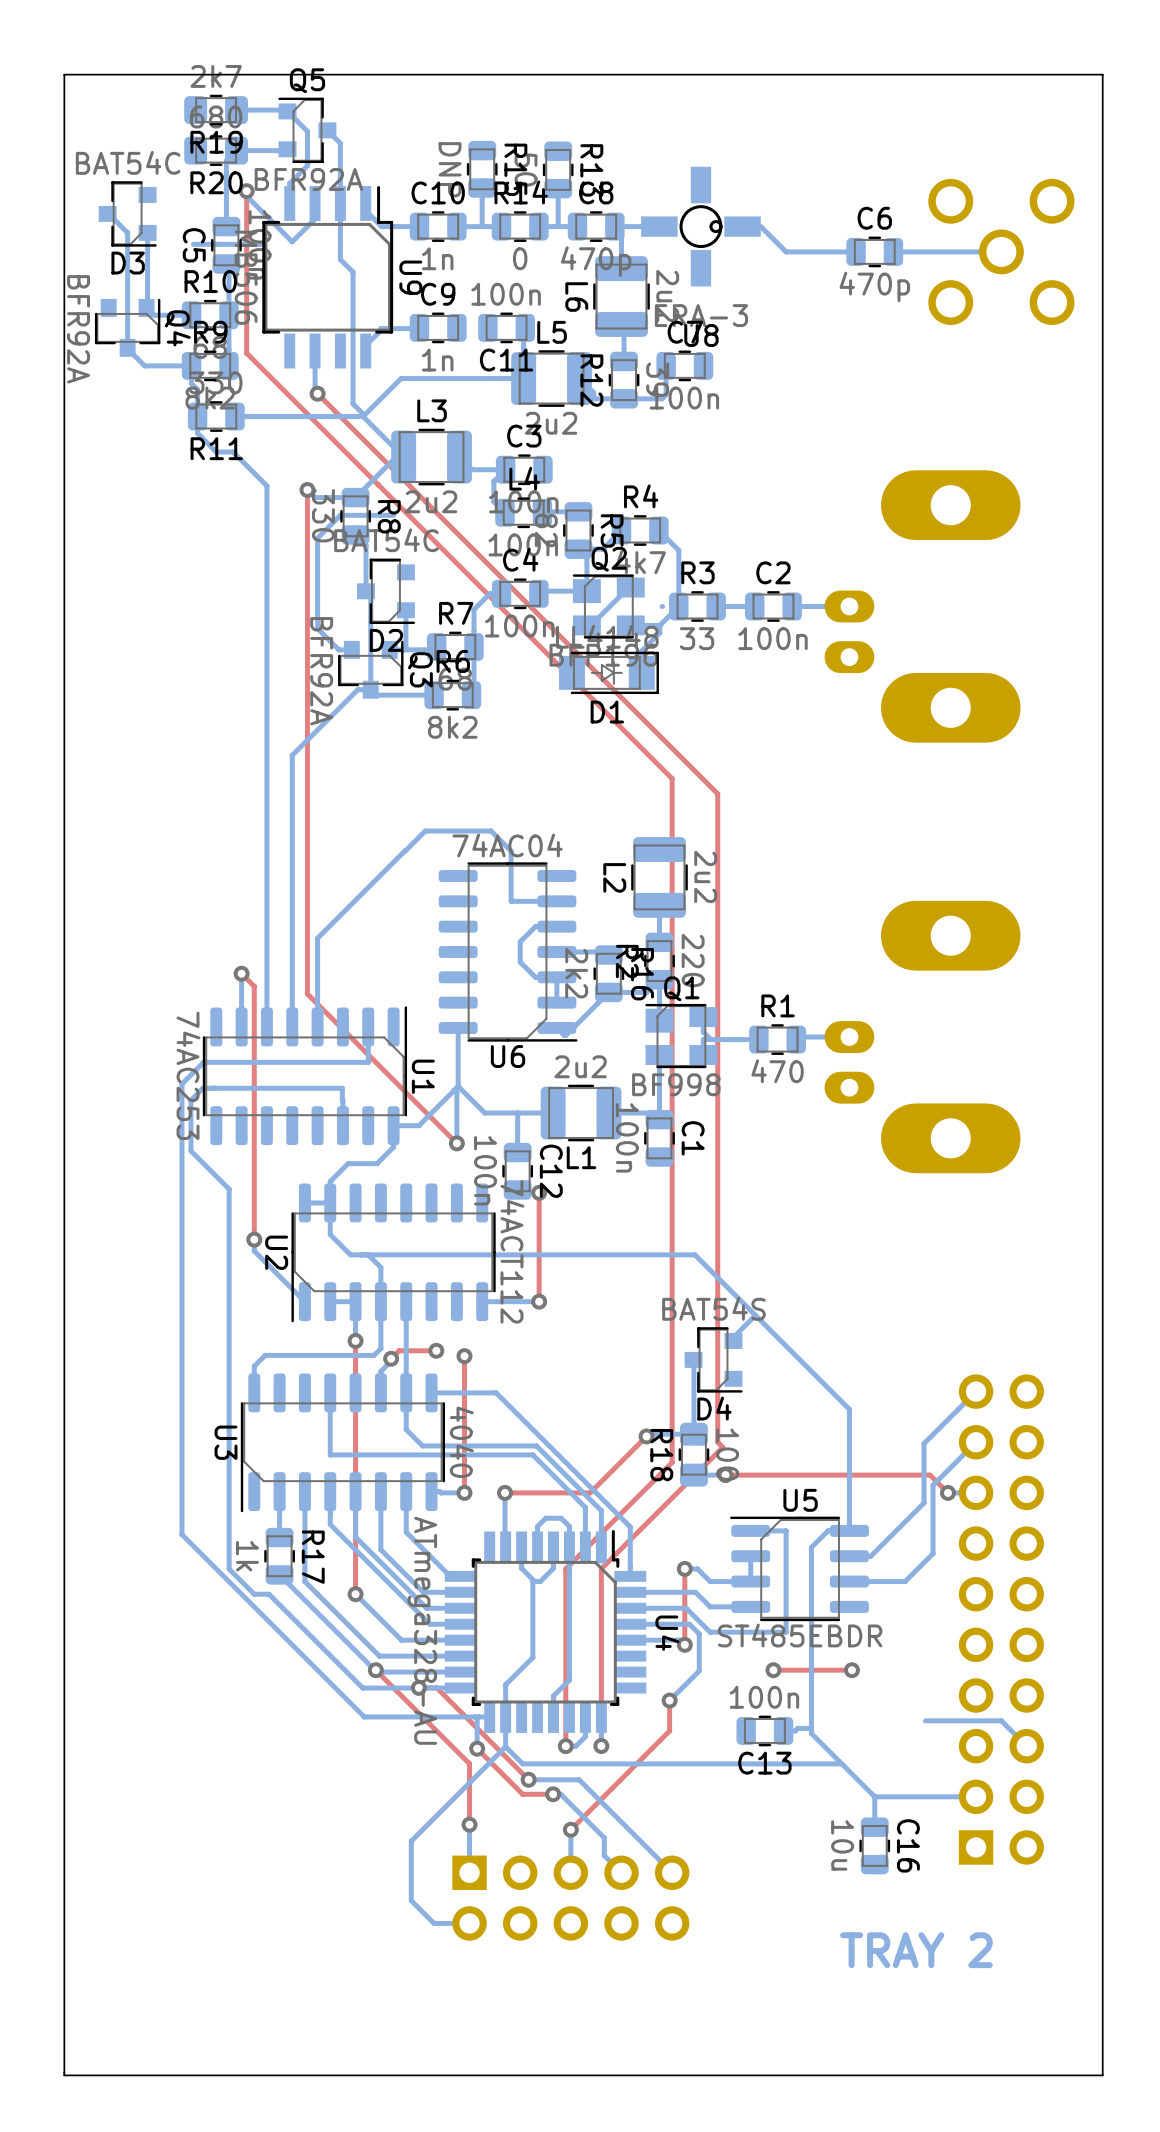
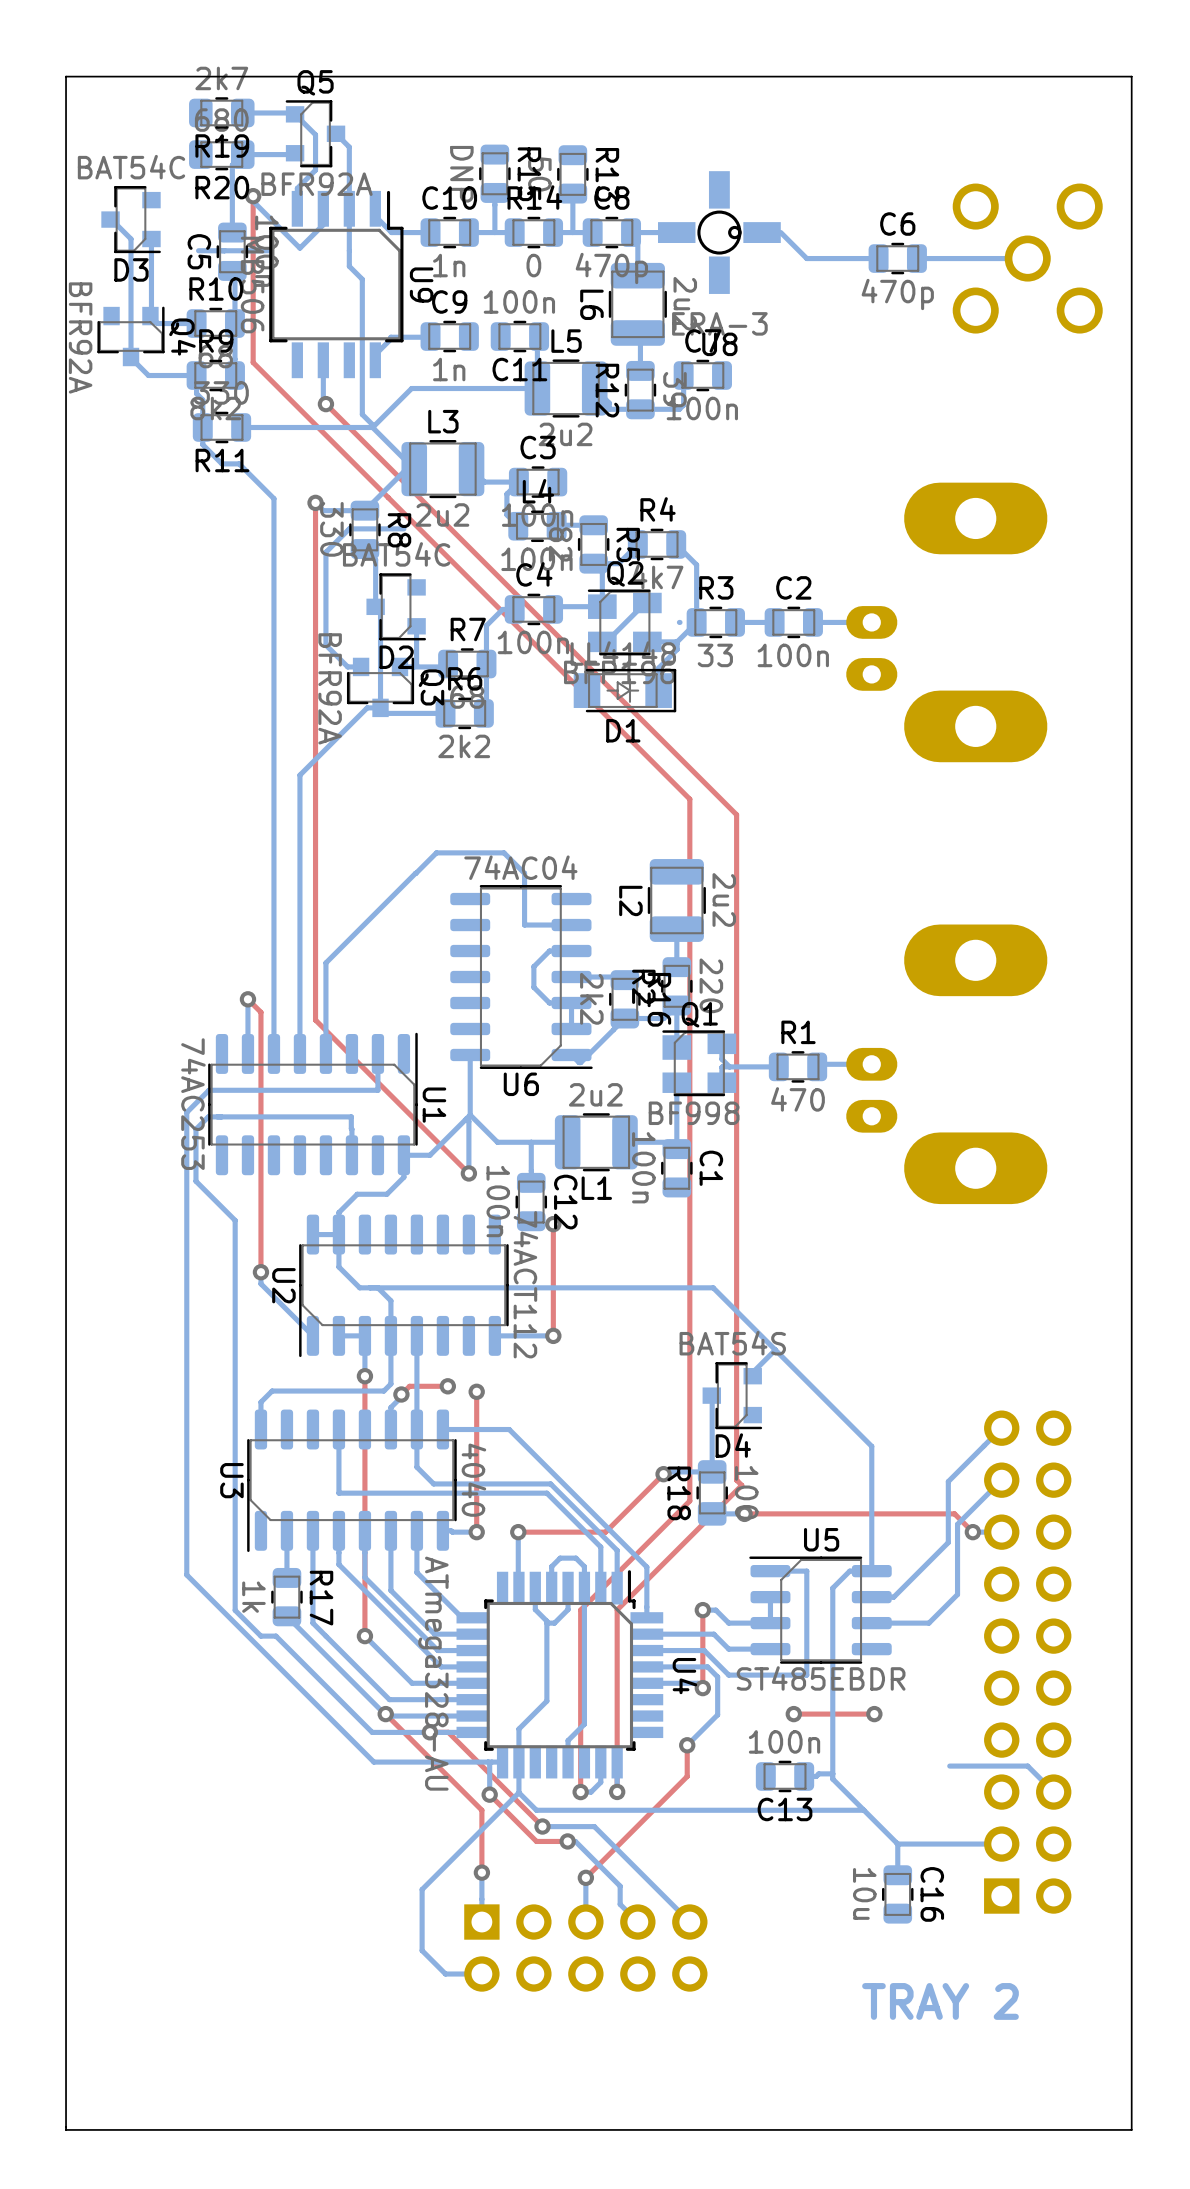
R6 value: 8k2 (452, 727) -> 2k2 (464, 746)

